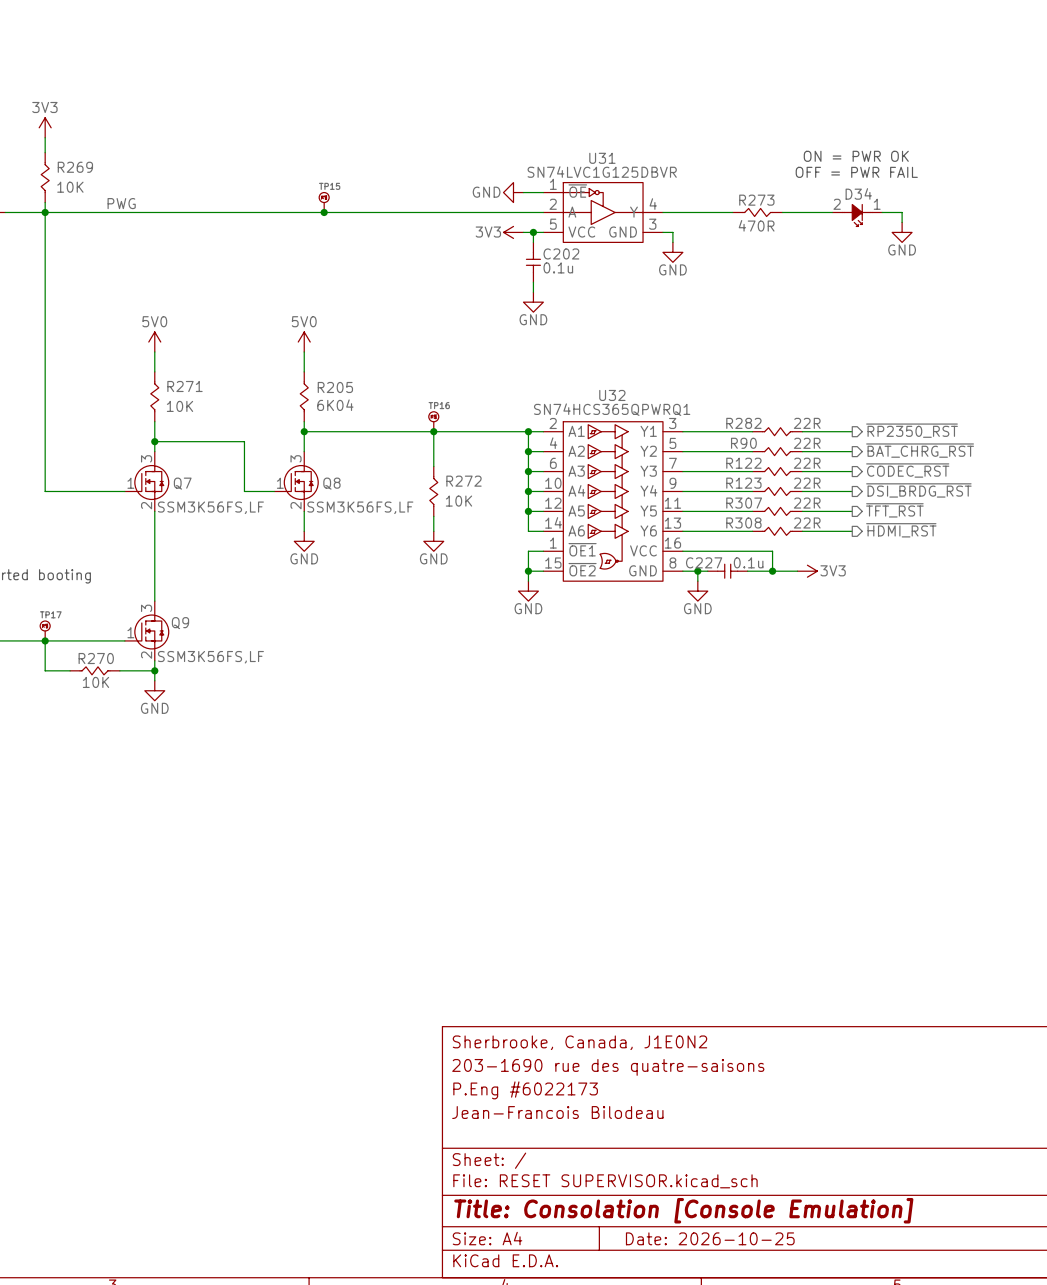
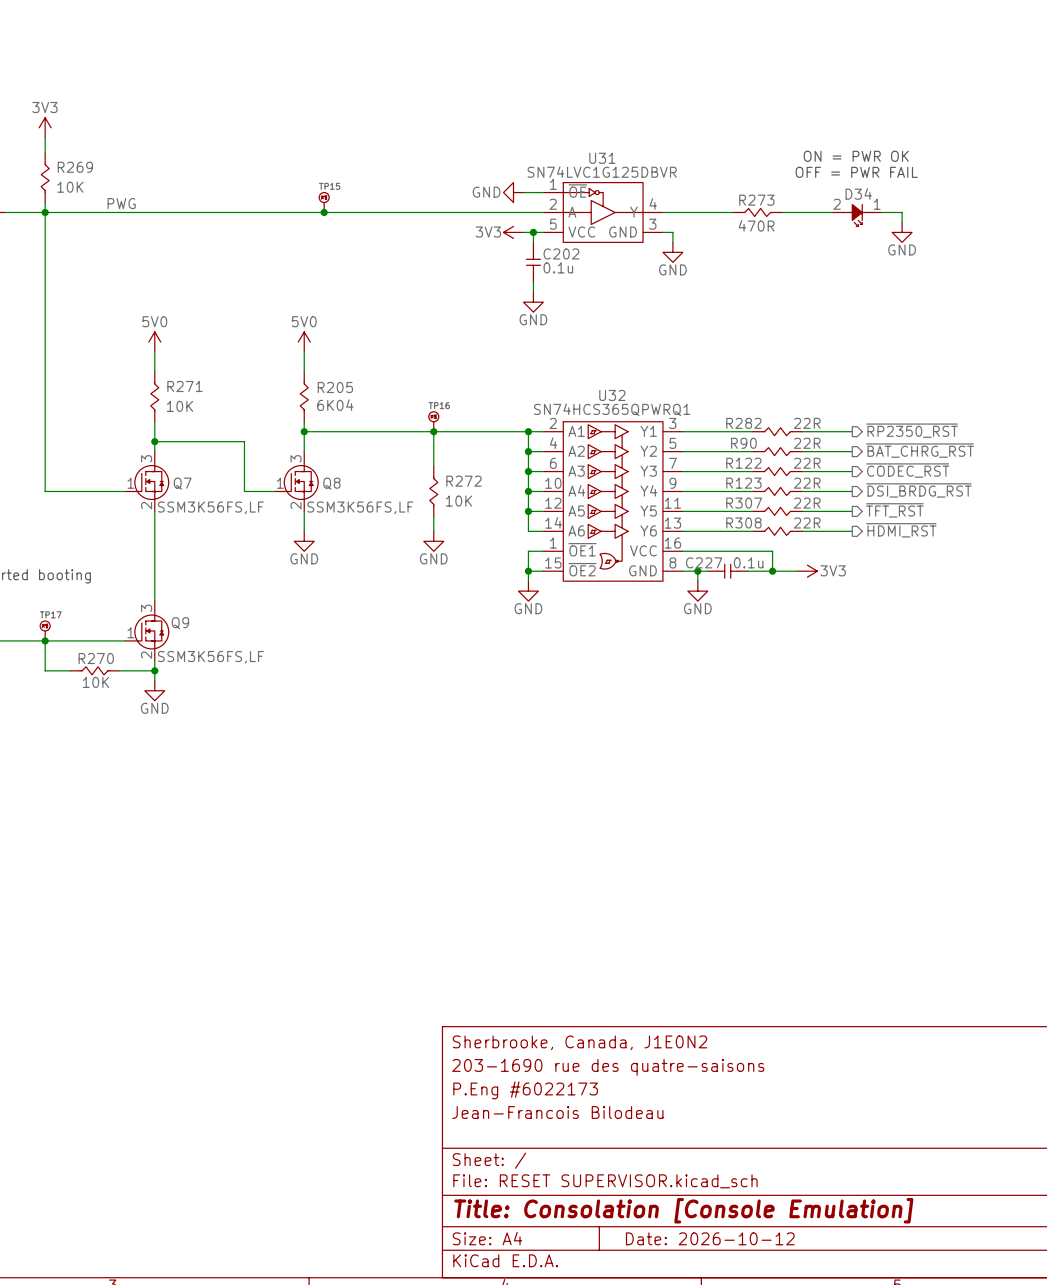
title block: Date: 2026-10-25 (710, 1238) -> Date: 2026-10-12 (710, 1238)

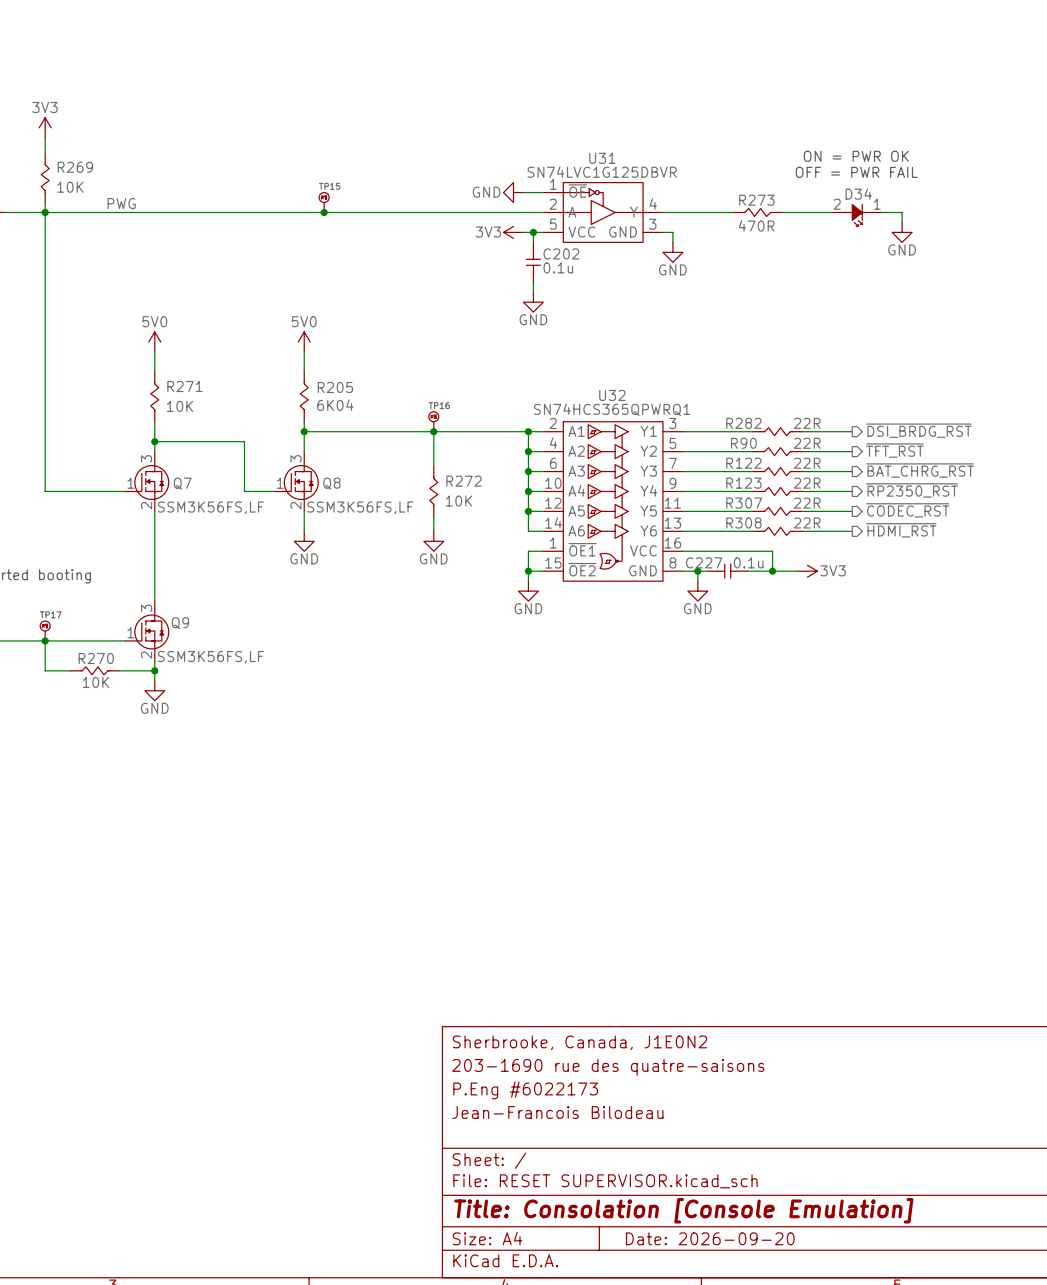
hierarchical label: ~{RP2350_RST} (912, 430) -> ~{DSI_BRDG_RST} (918, 430)
hierarchical label: ~{BAT_CHRG_RST} (920, 450) -> ~{TFT_RST} (894, 450)
hierarchical label: ~{CODEC_RST} (907, 470) -> ~{BAT_CHRG_RST} (920, 470)
hierarchical label: ~{DSI_BRDG_RST} (918, 490) -> ~{RP2350_RST} (912, 490)
hierarchical label: ~{TFT_RST} (894, 510) -> ~{CODEC_RST} (907, 510)
title block: Date: 2026-10-12 (710, 1238) -> Date: 2026-09-20 (710, 1238)

